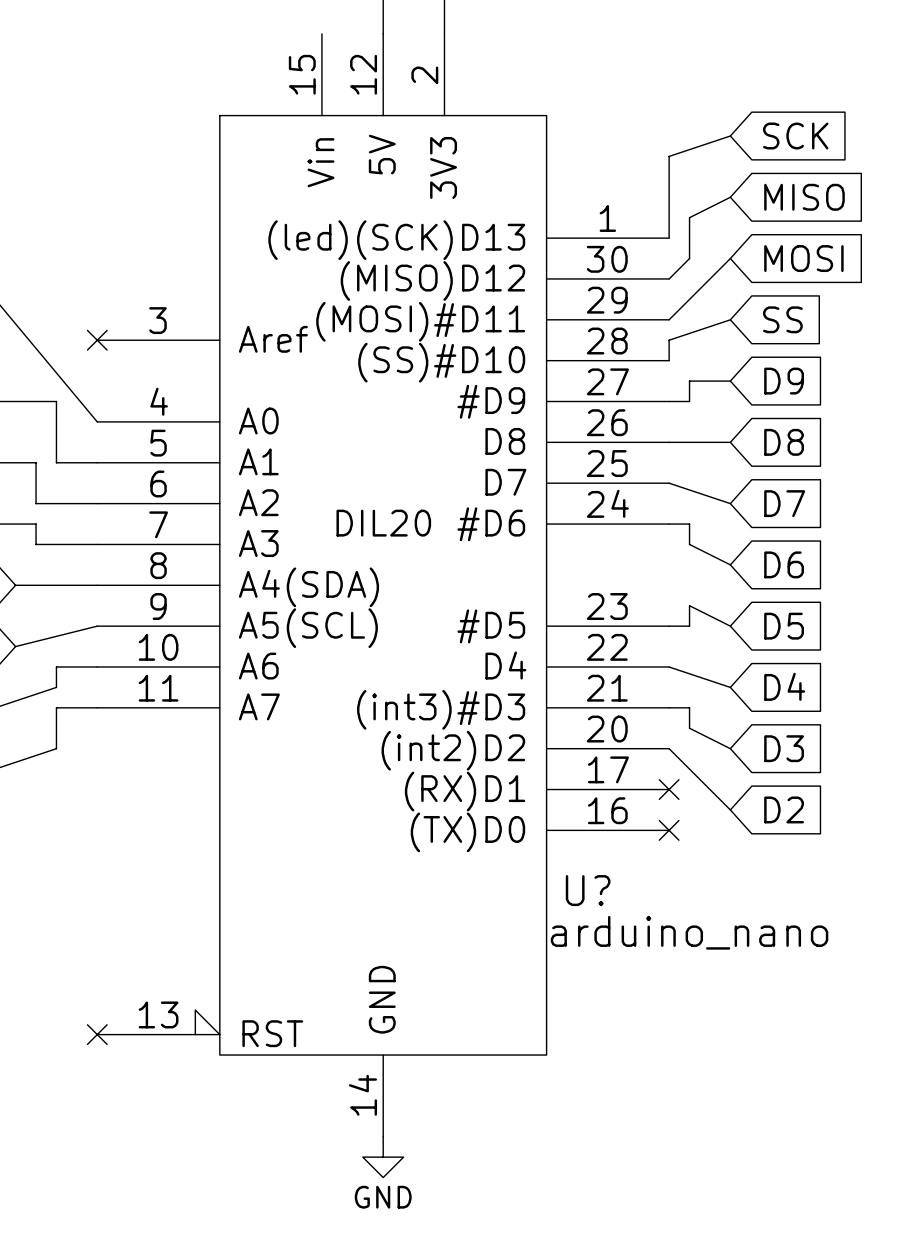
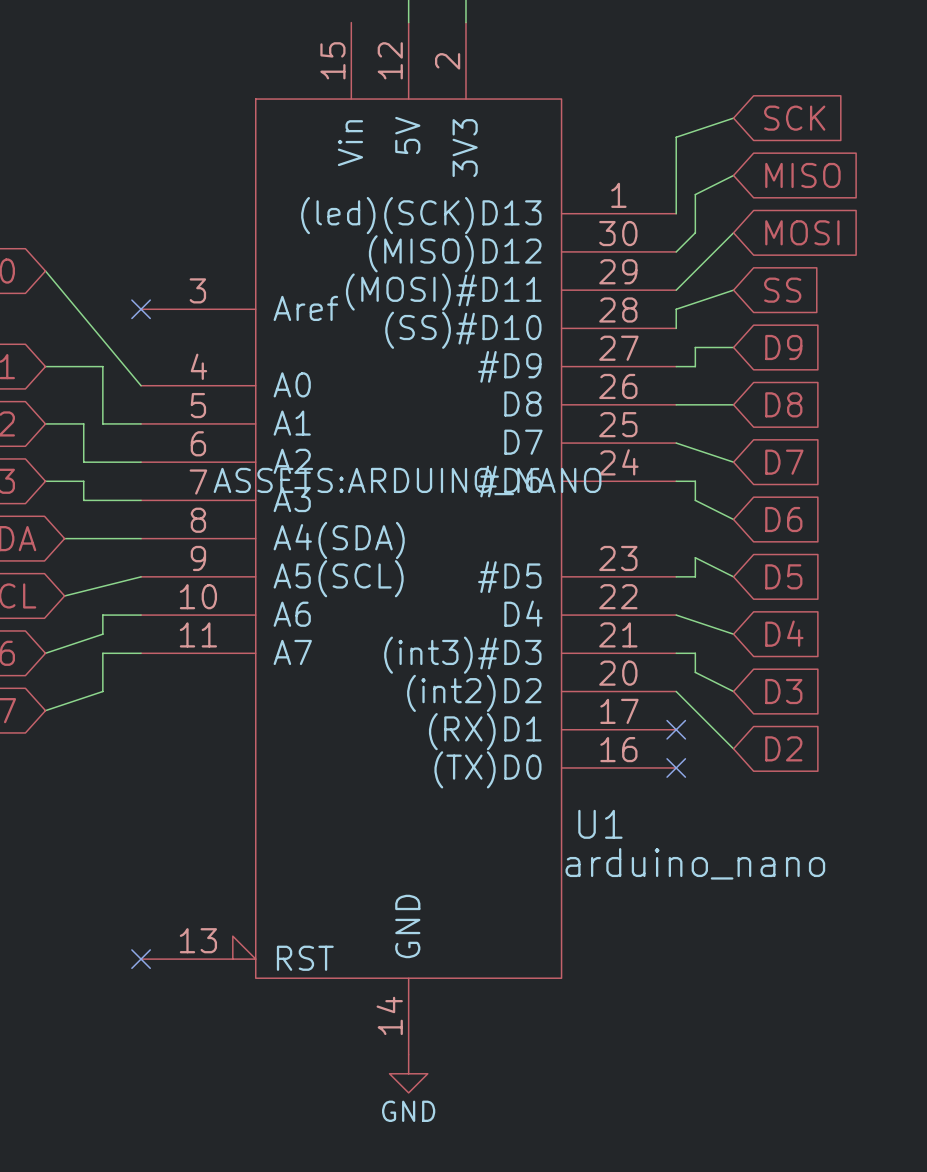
U? text: DIL20 (383, 523) -> ASSETS:ARDUINO_NANO (407, 481)
U? name: U? (588, 890) -> U1 (600, 824)

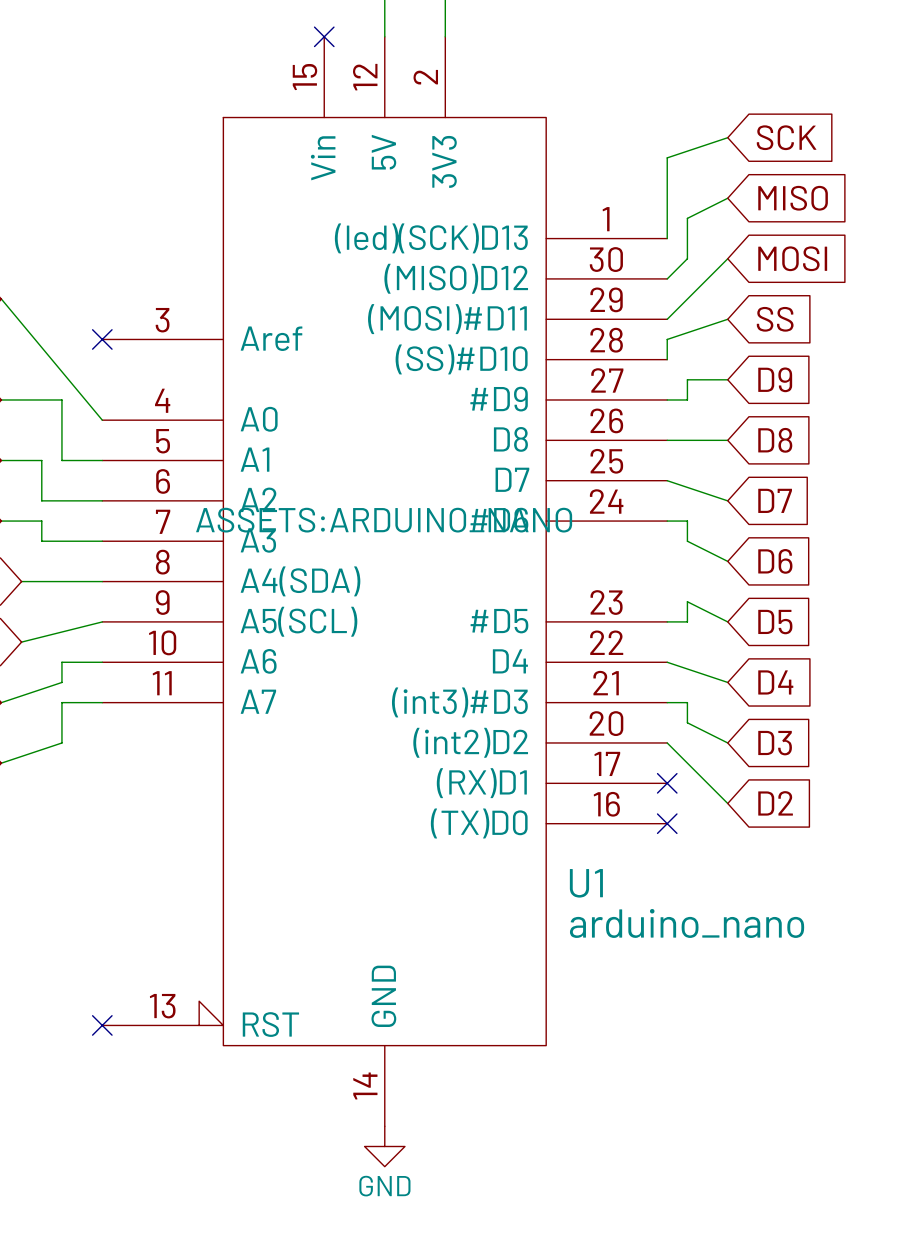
no-connect mark: none -> (324, 36)

